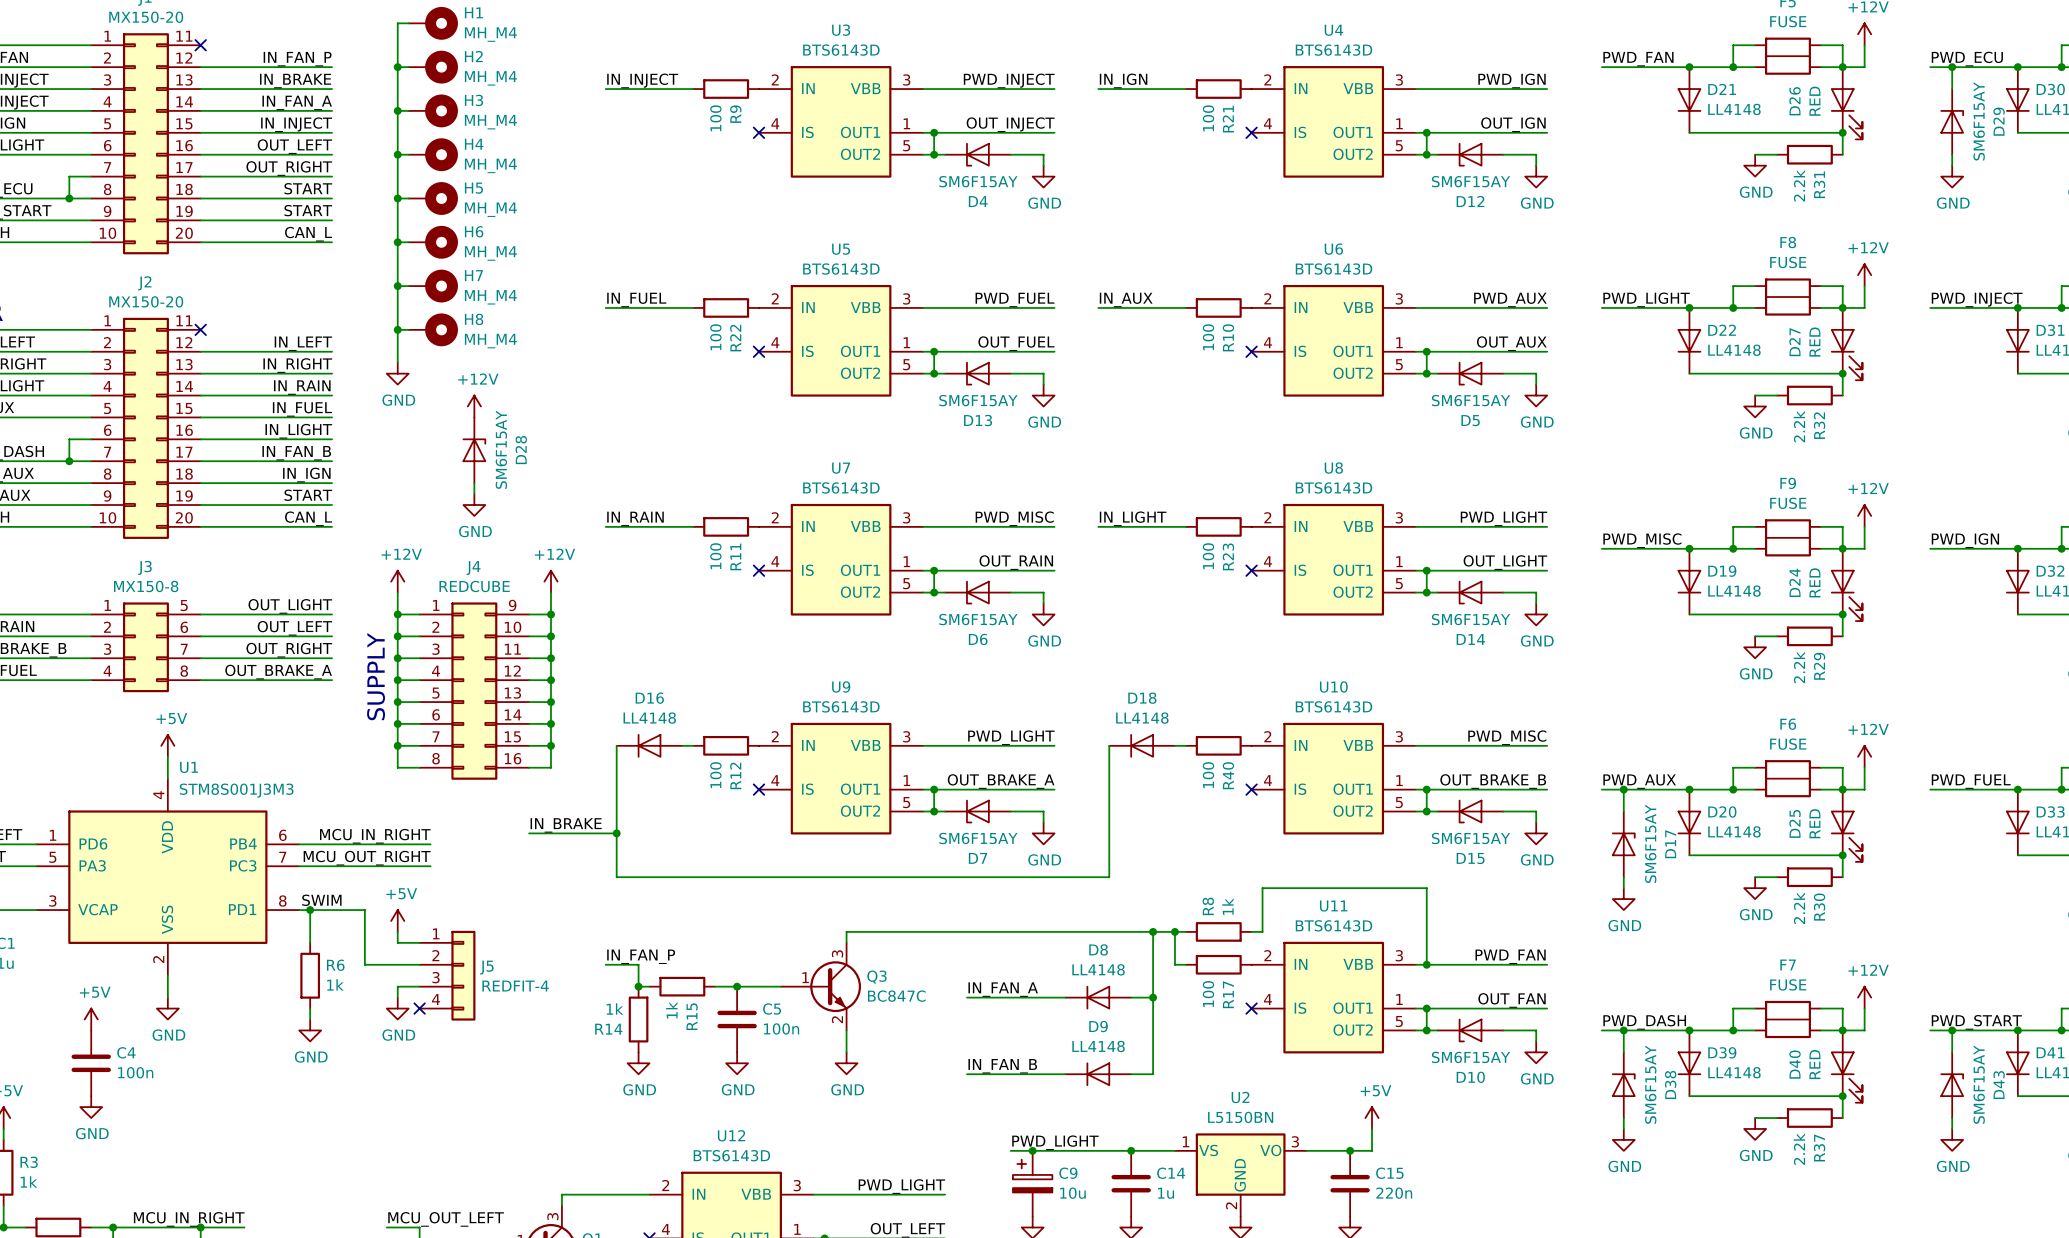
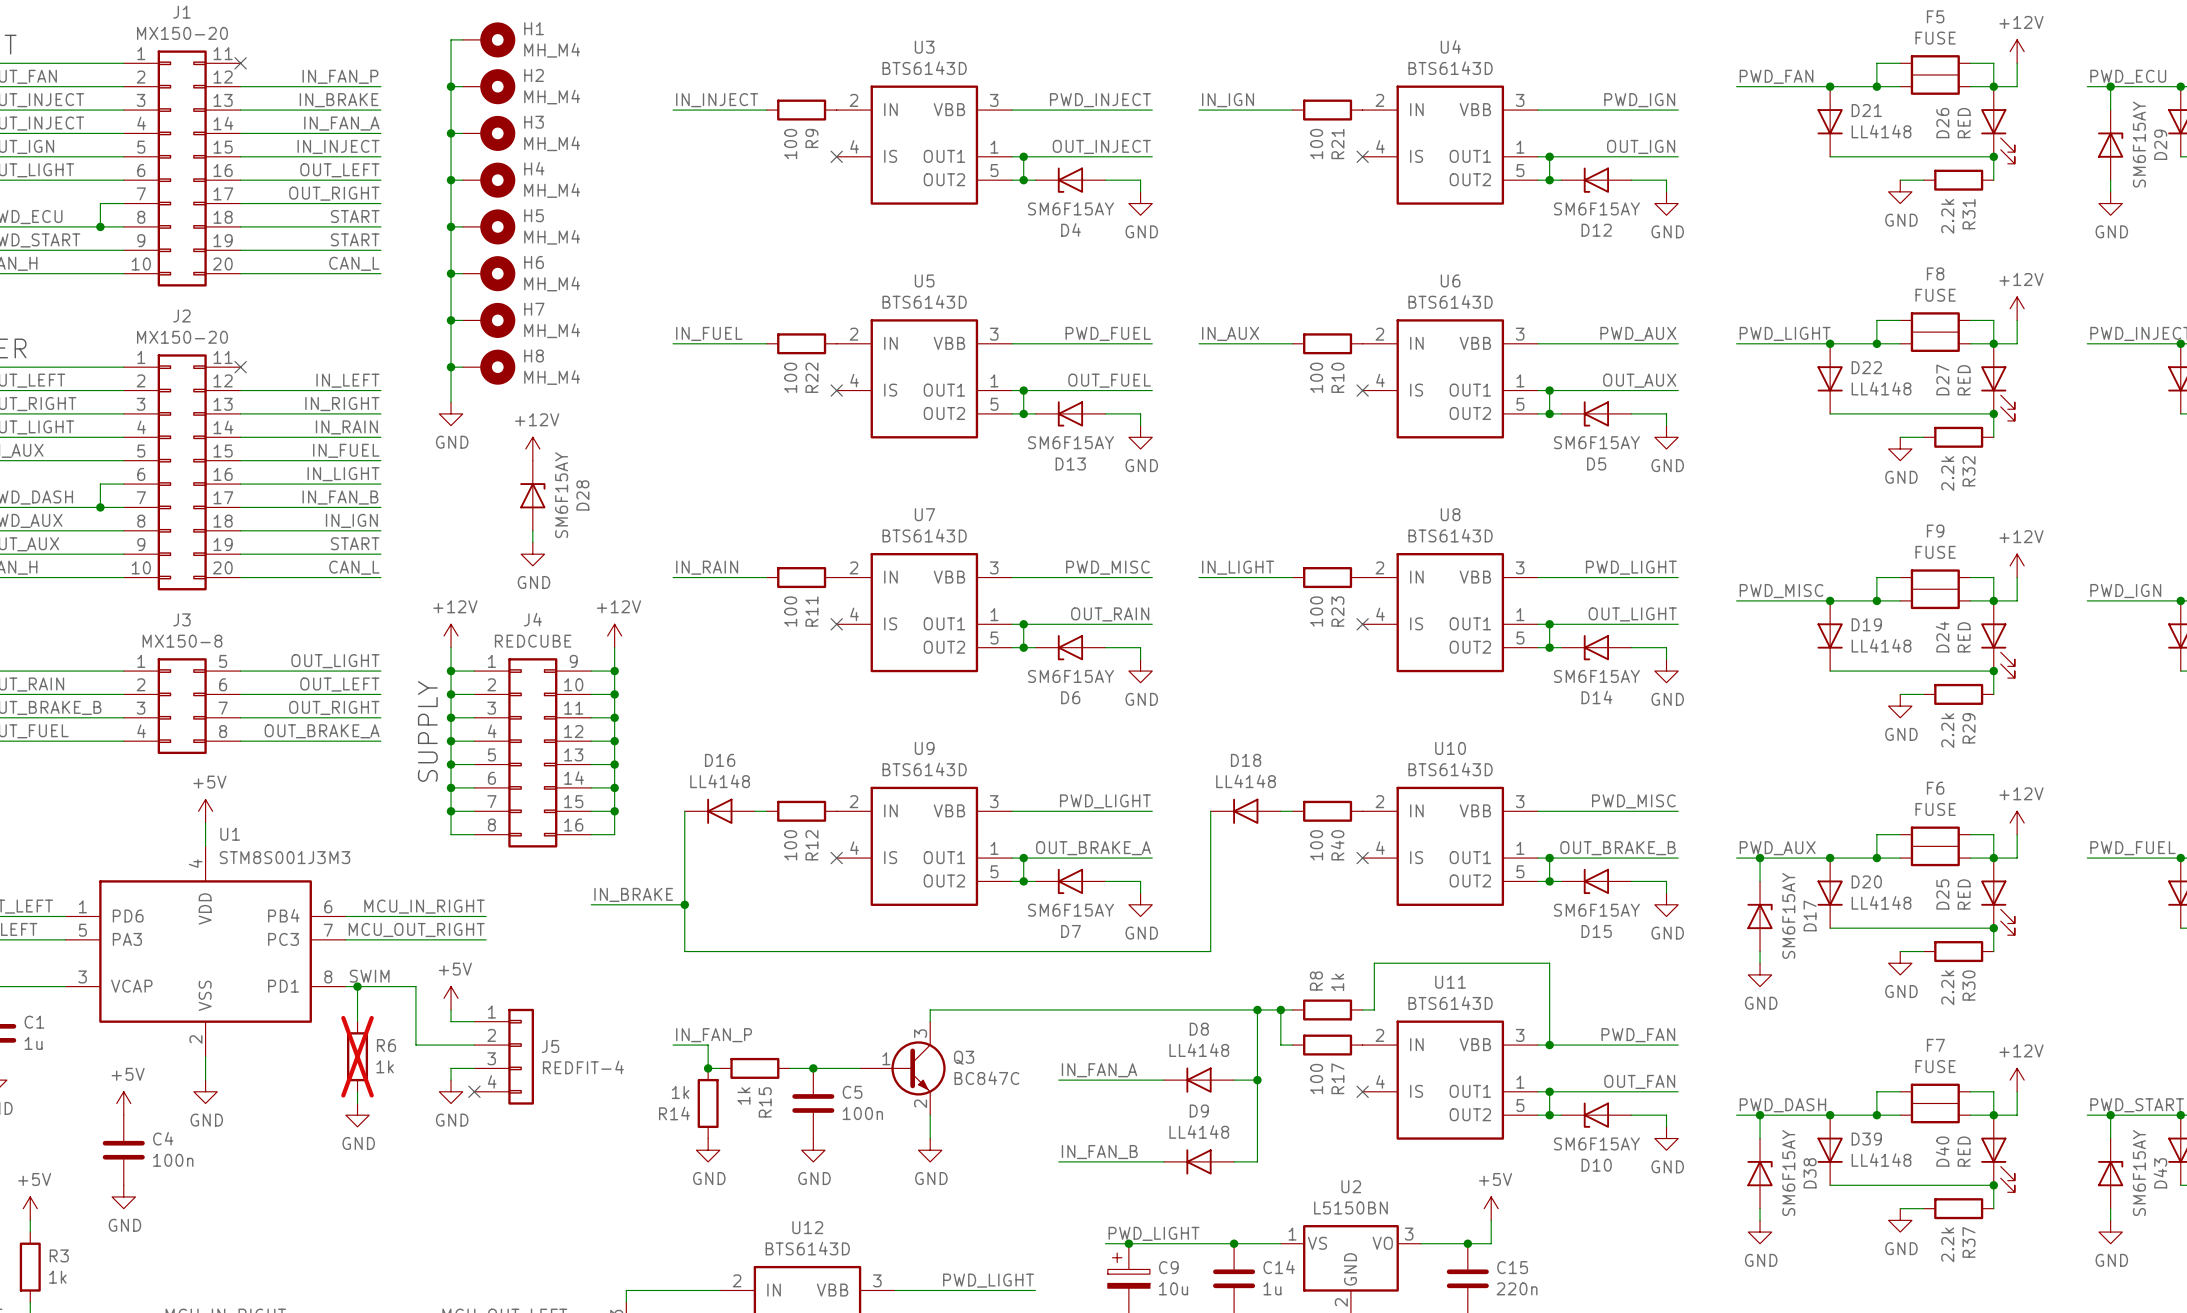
R6 do-not-place cross: none -> (357, 1056)

